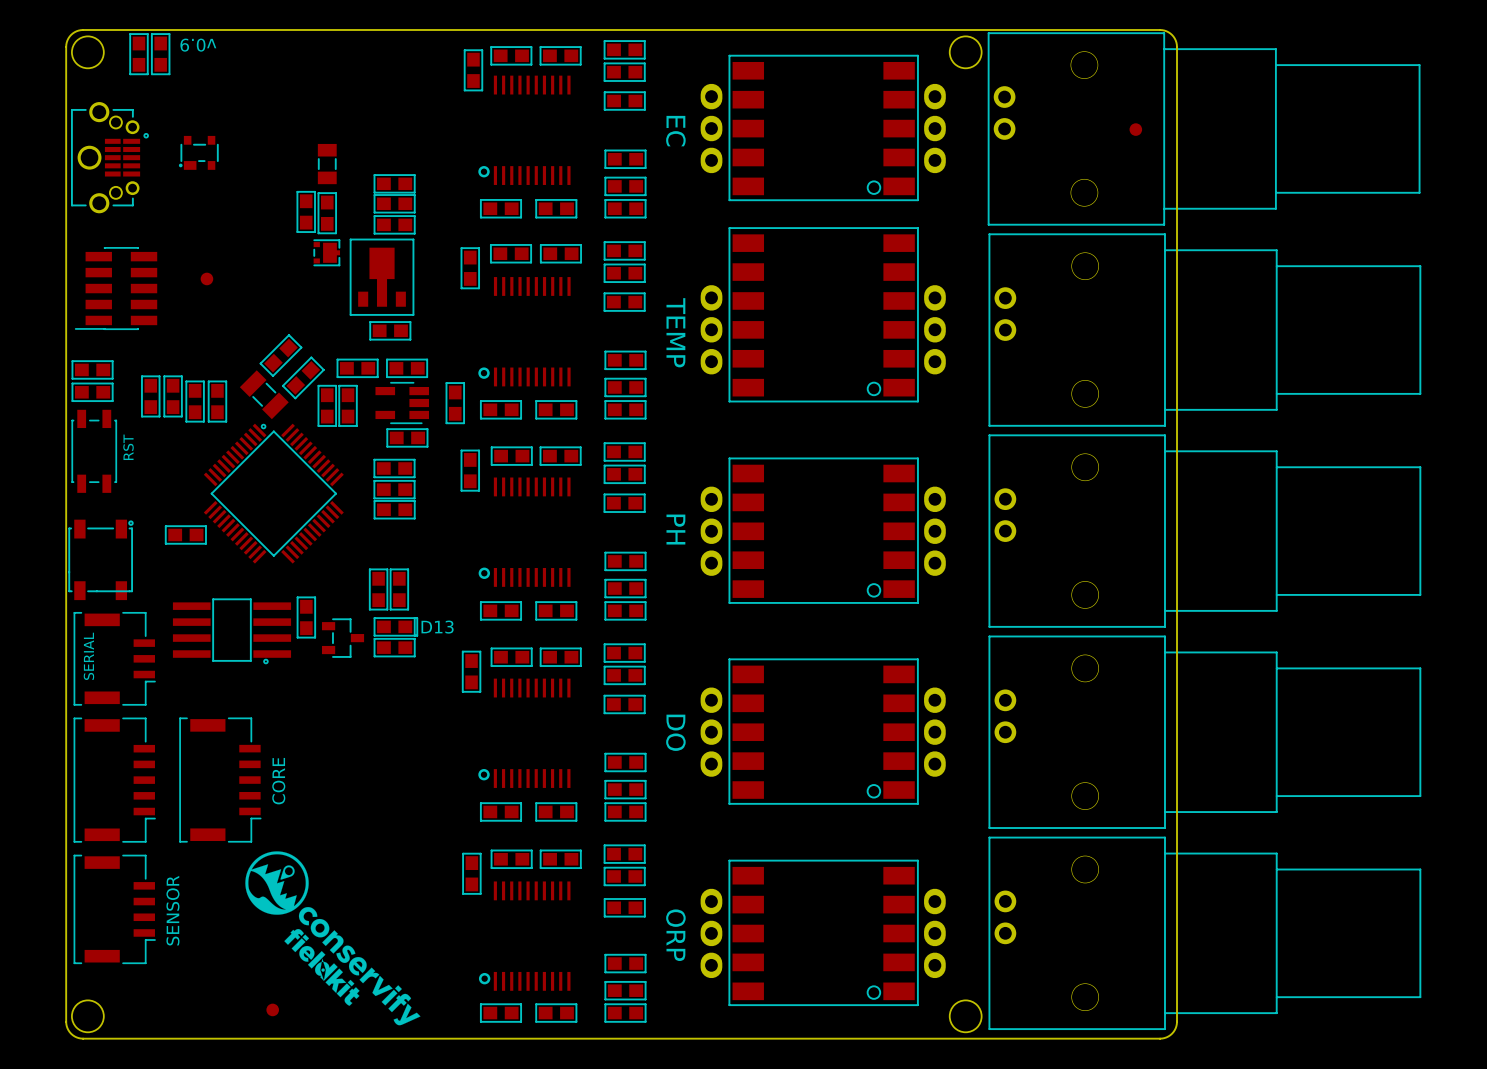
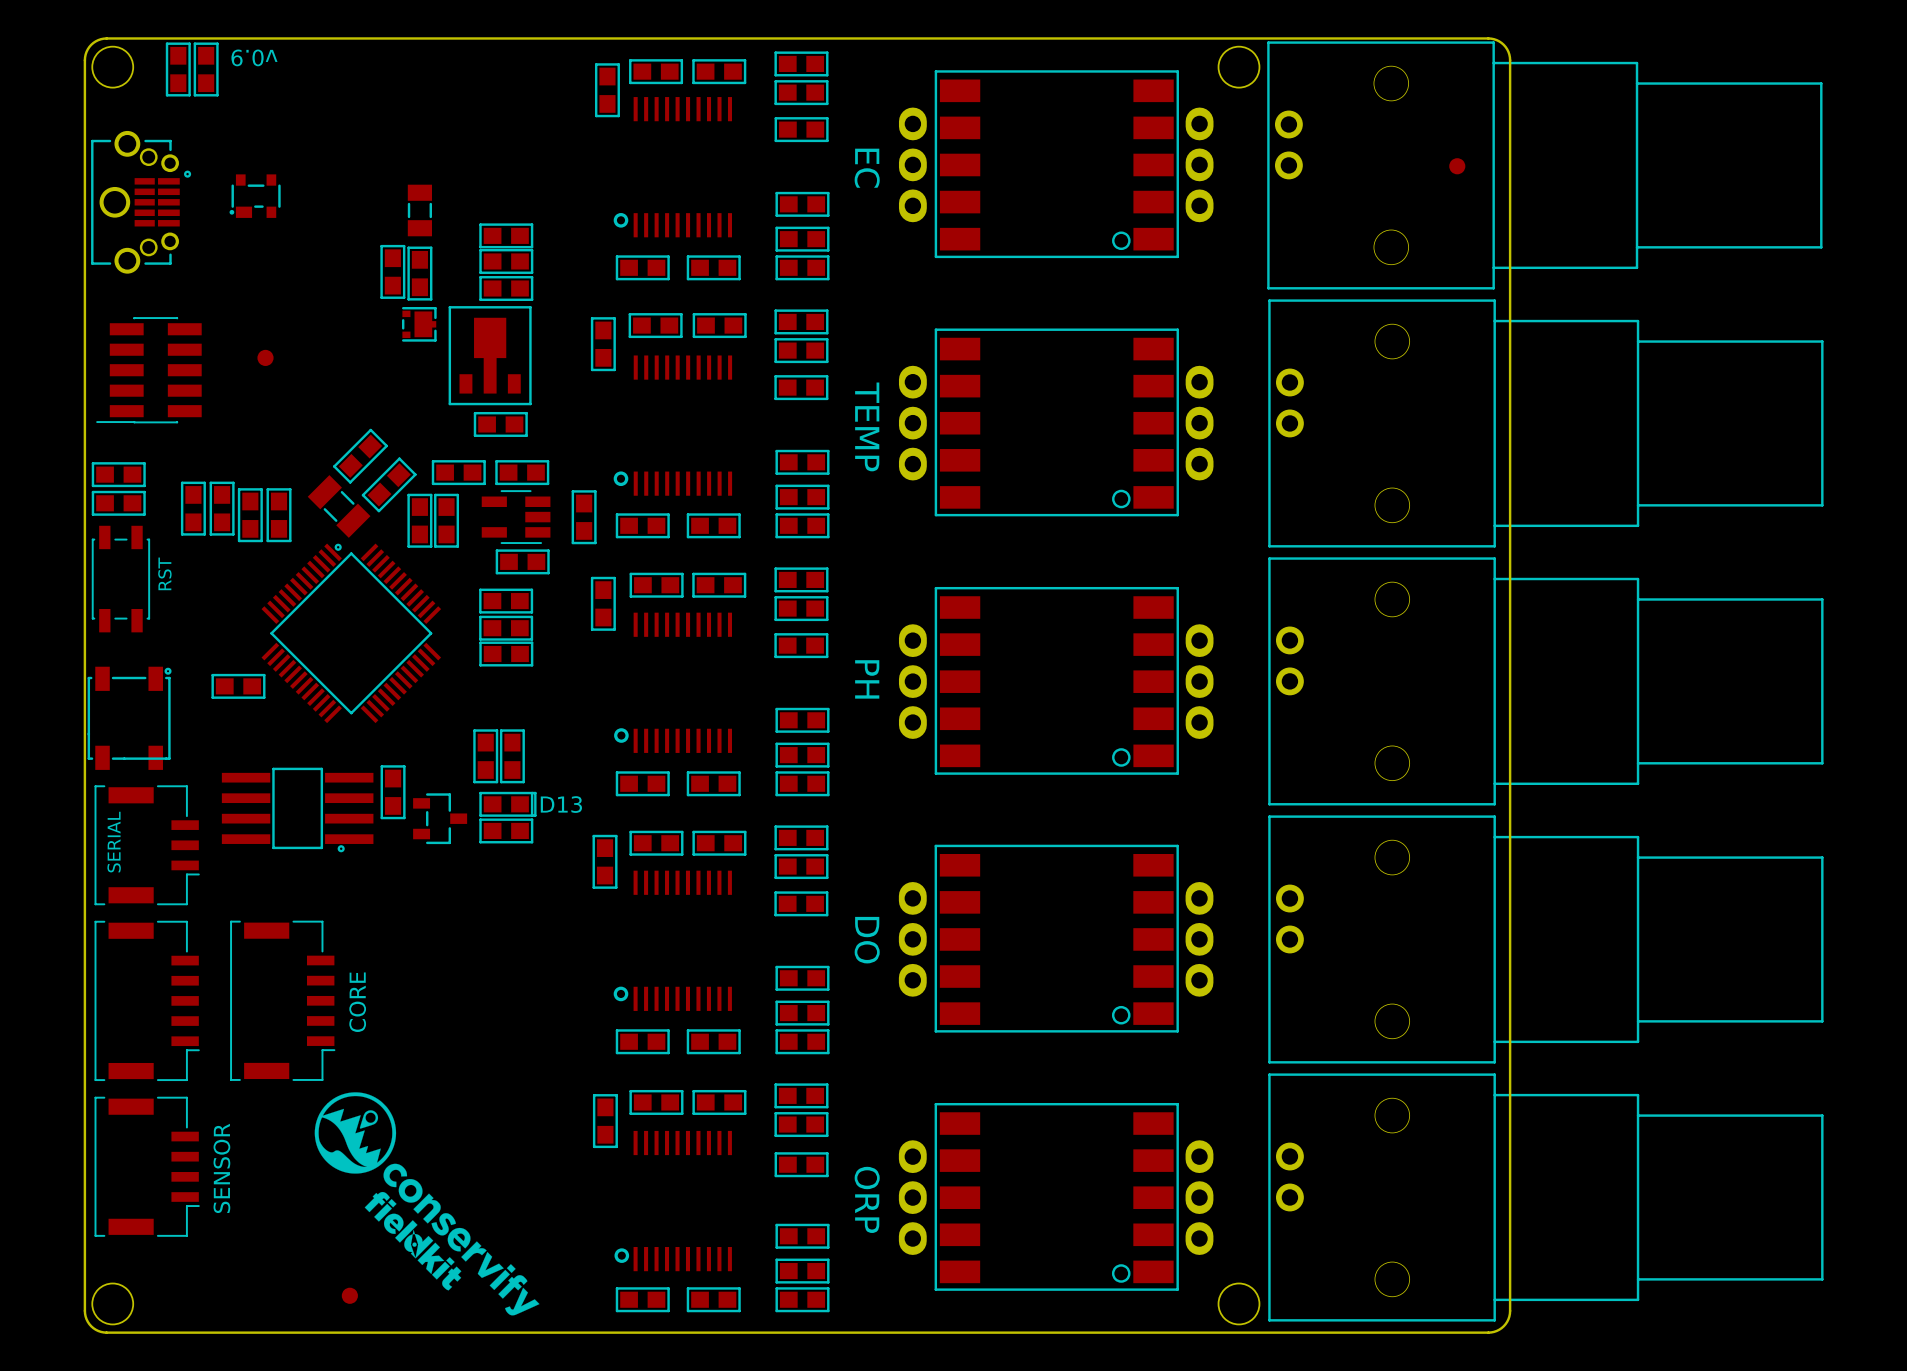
part: (823, 314) -> none
part: none -> (1056, 422)

